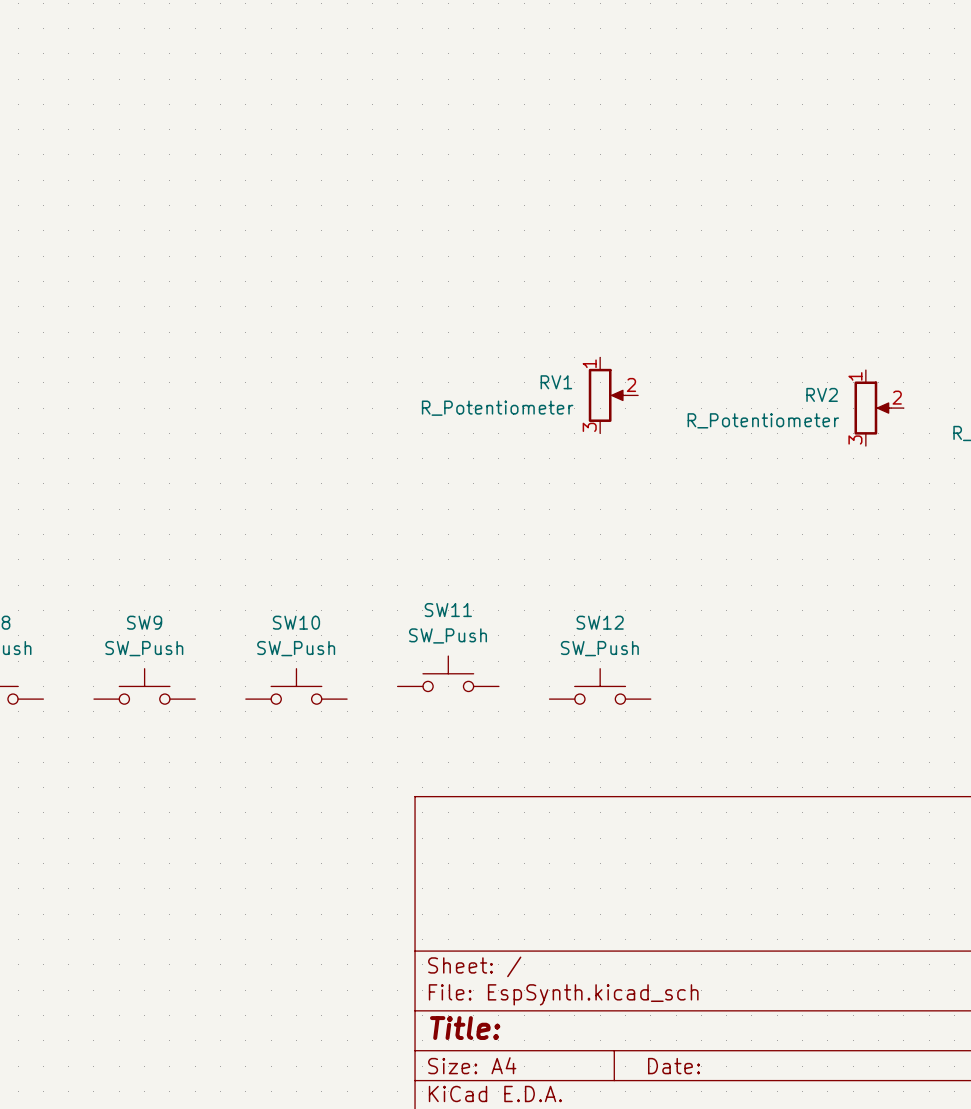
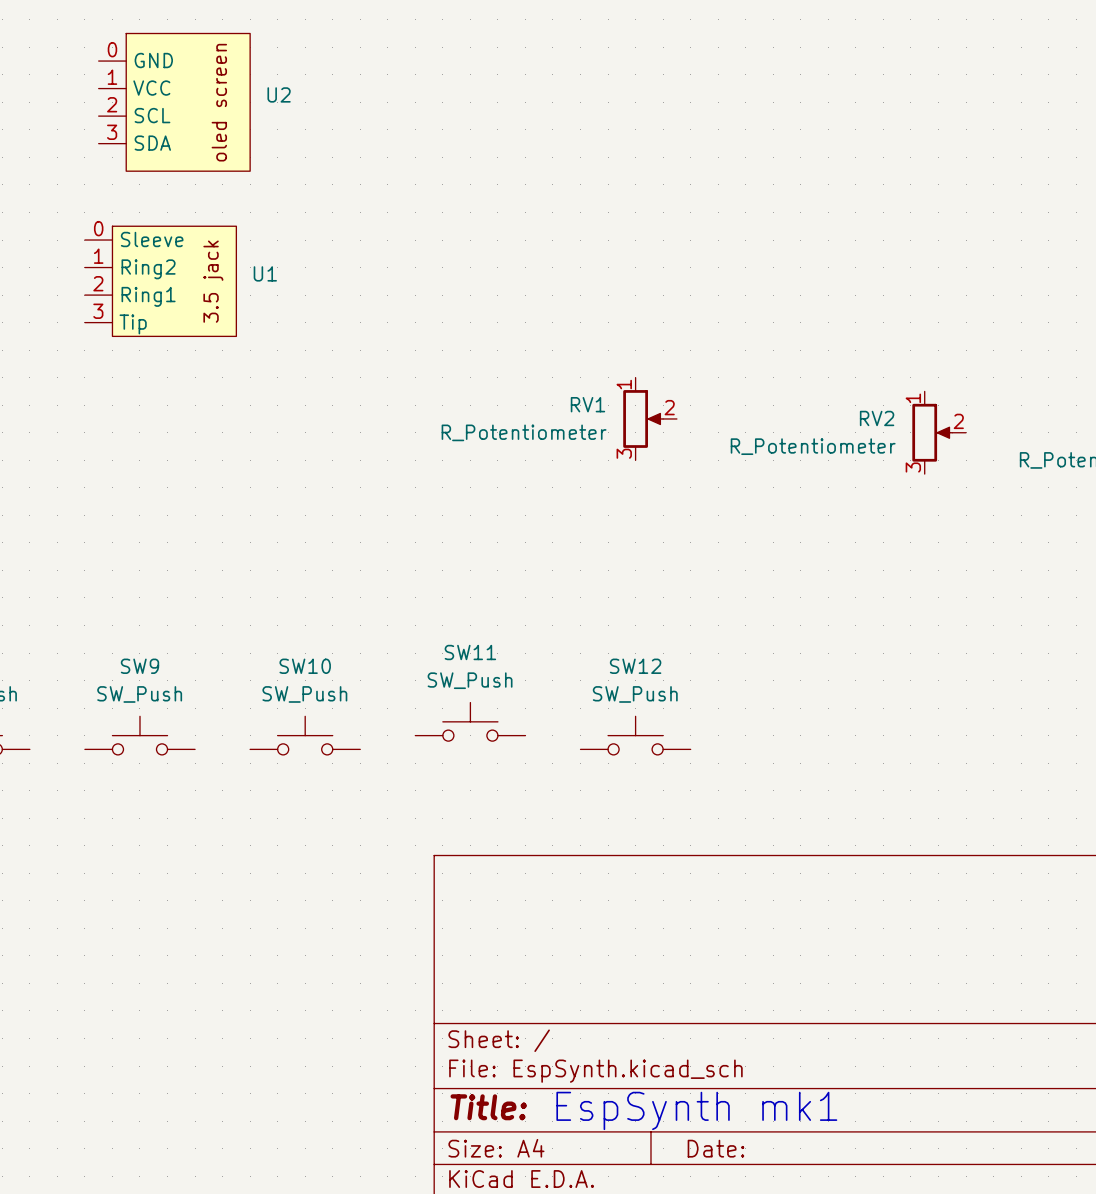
U2: none -> (174, 102)
U1: none -> (160, 281)
text: none -> EspSynth mk1 (696, 1110)

